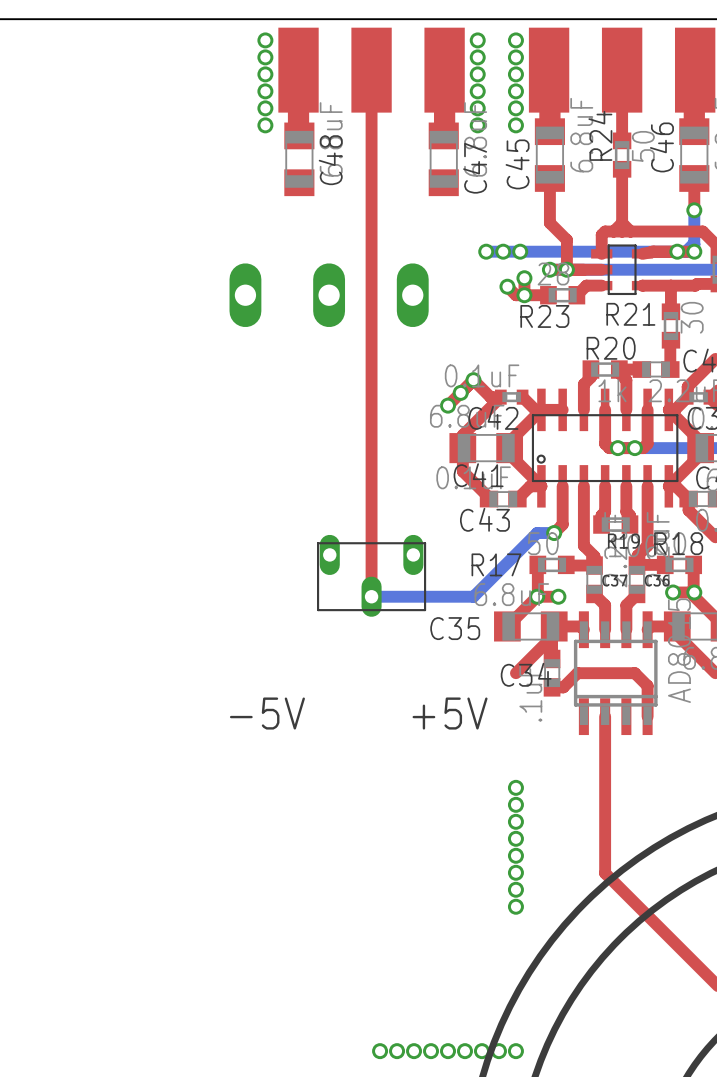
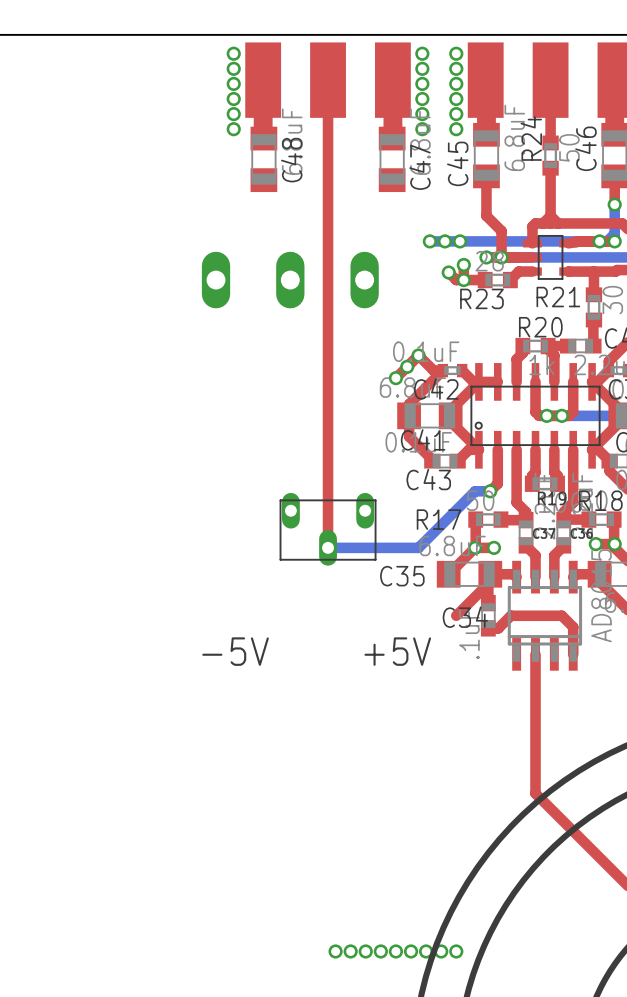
via: (515, 787) -> none
via: (515, 804) -> none
via: (515, 821) -> none
via: (515, 838) -> none
via: (515, 855) -> none
via: (515, 872) -> none
via: (515, 889) -> none
via: (515, 906) -> none

